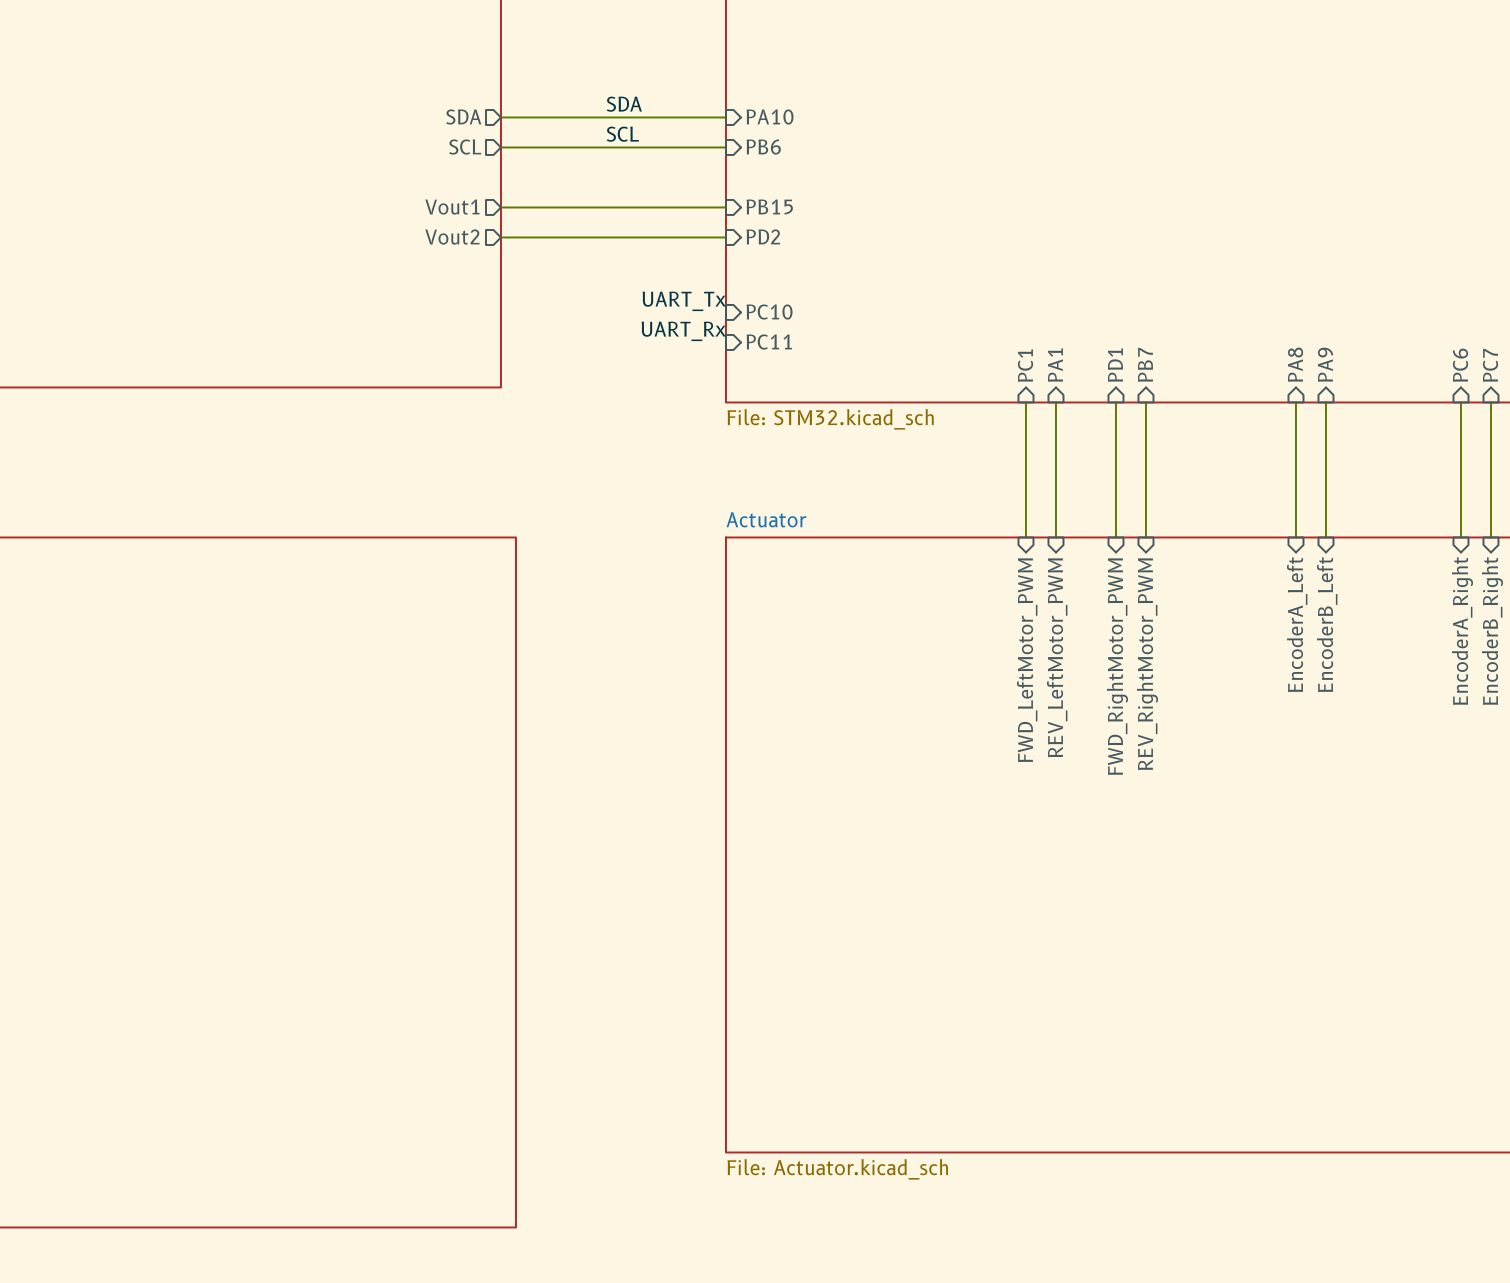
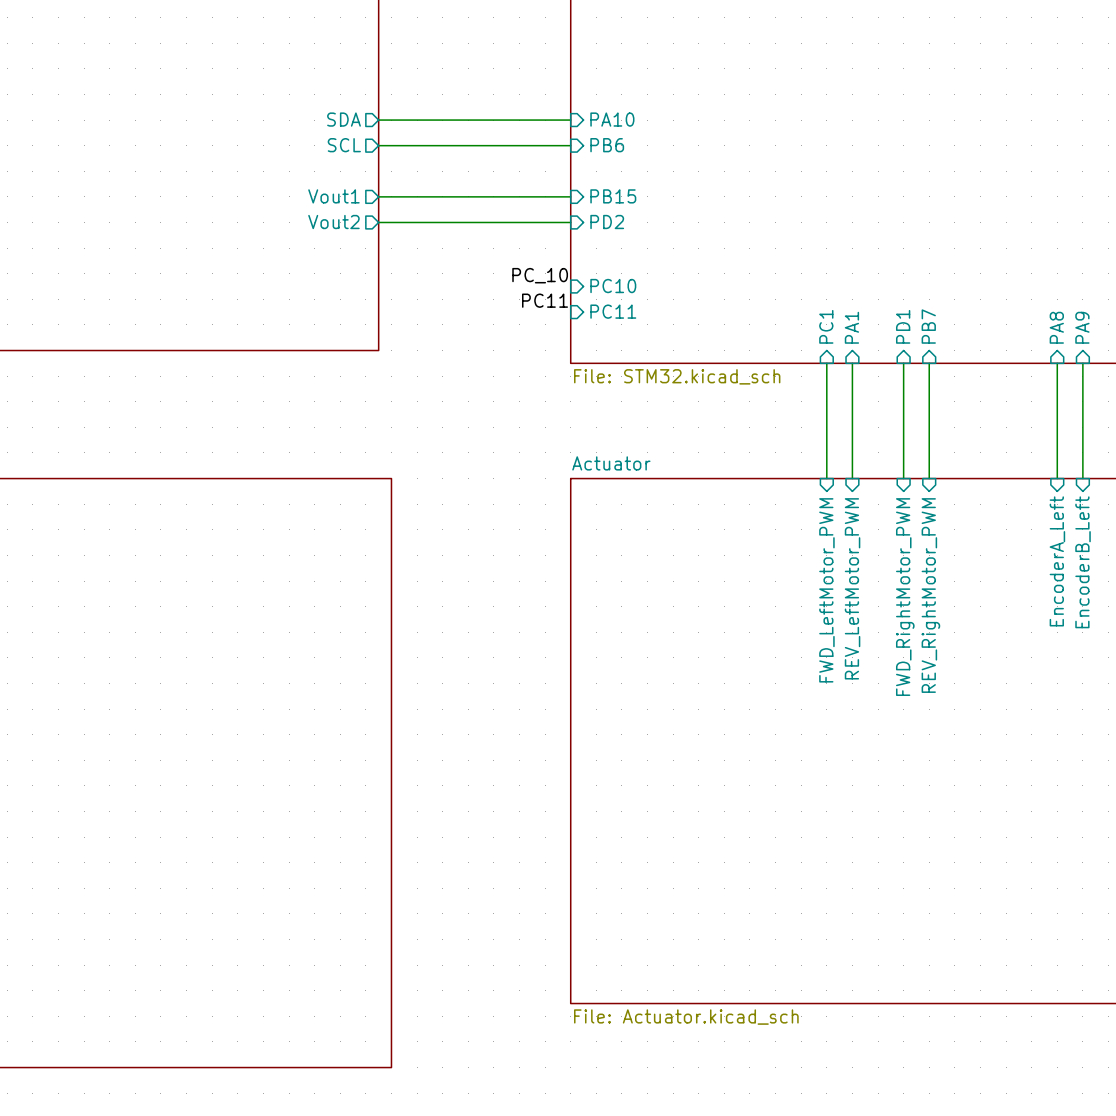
label: SDA (624, 104) -> none
label: SCL (622, 134) -> none
label: UART_Tx (684, 301) -> PC_10 (540, 275)
label: UART_Rx (683, 331) -> PC11 (545, 300)

